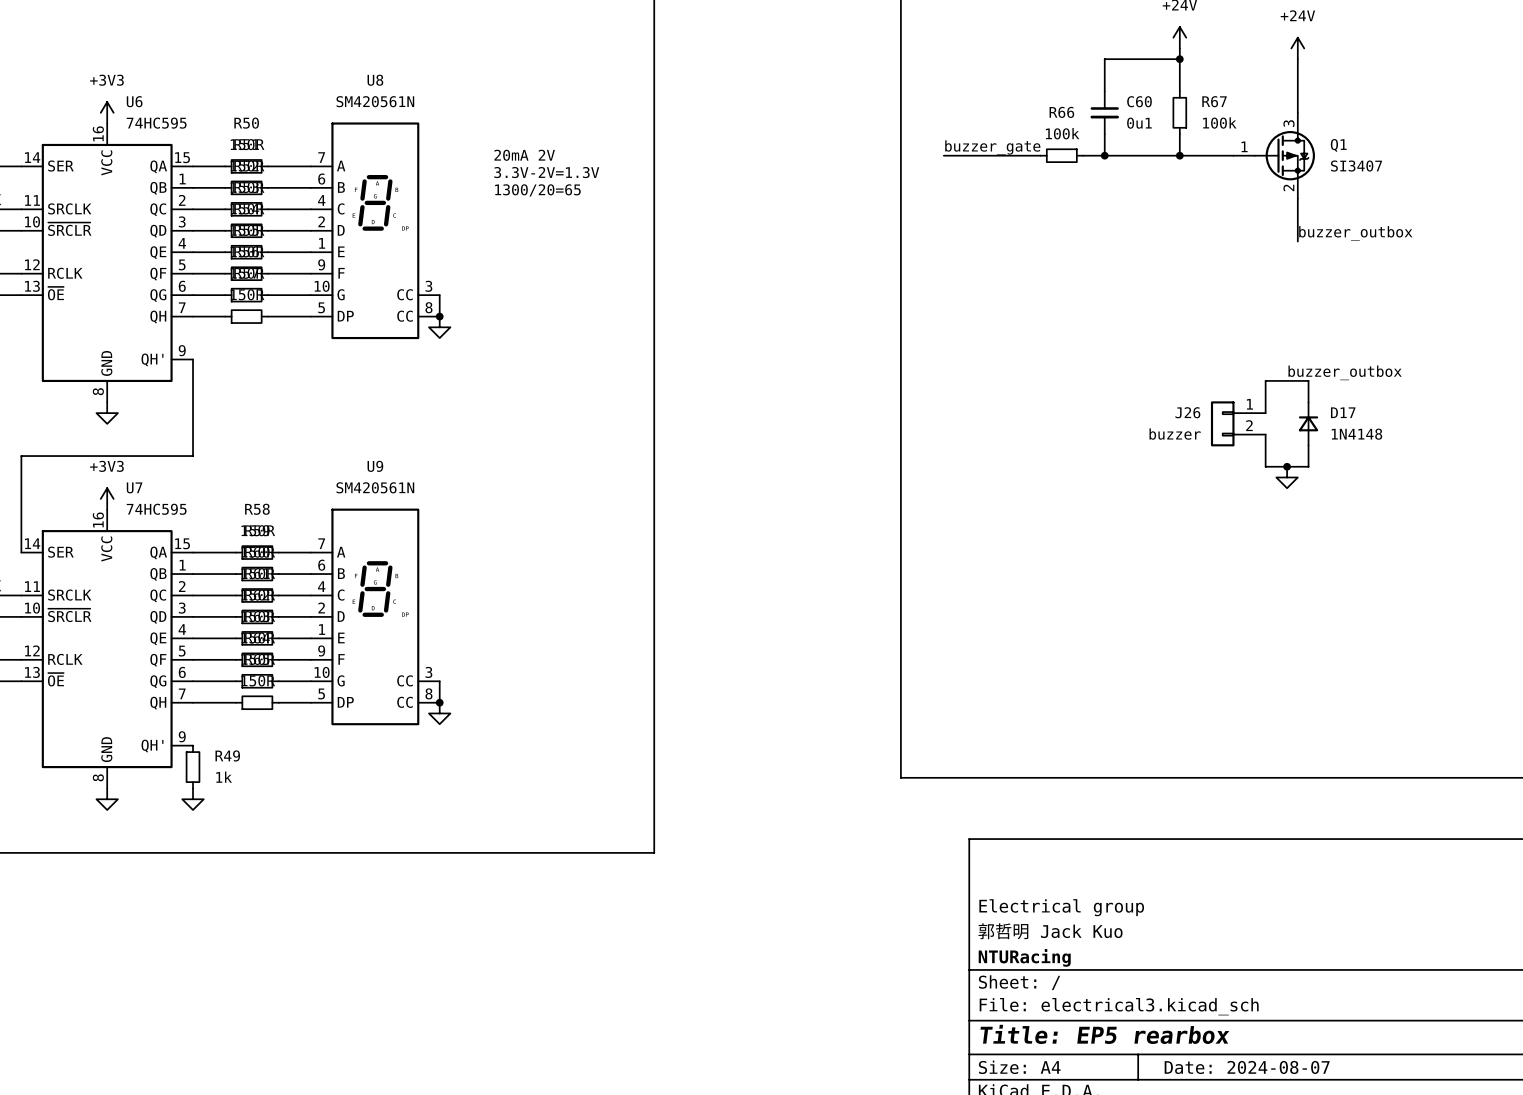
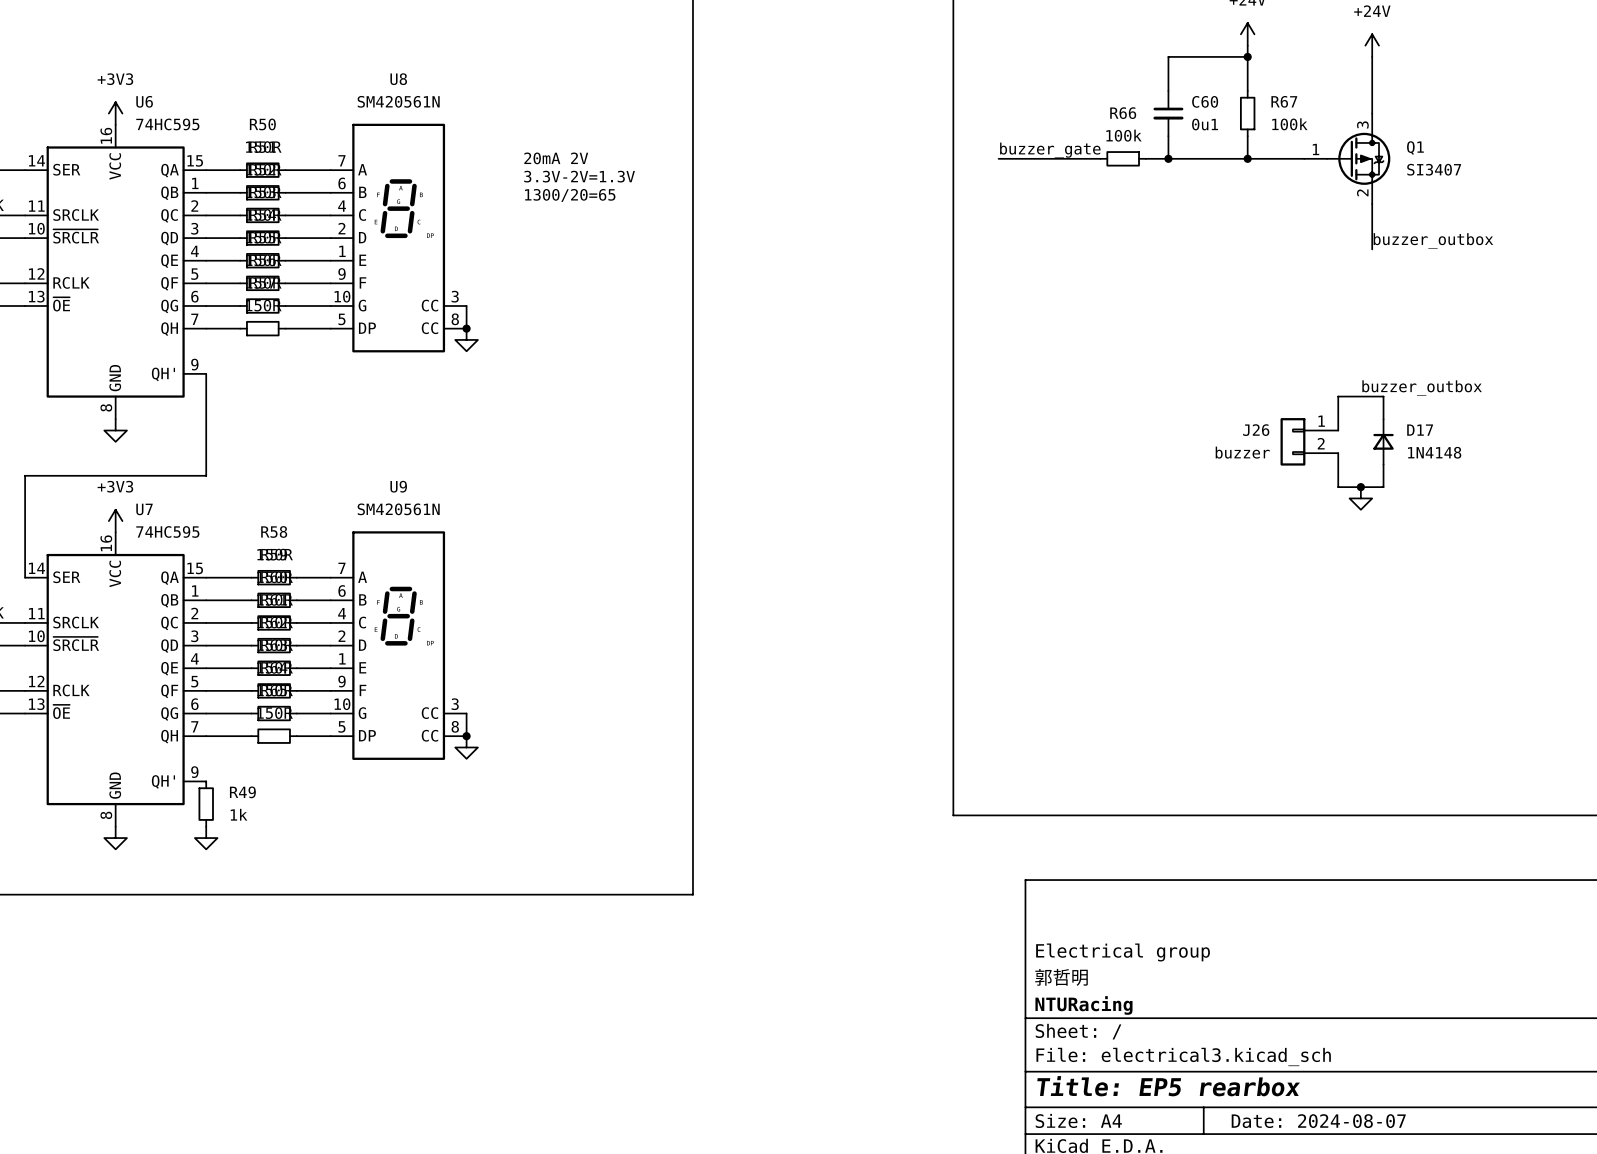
title block: 郭哲明 Jack Kuo (1050, 931) -> 郭哲明 (1061, 977)

